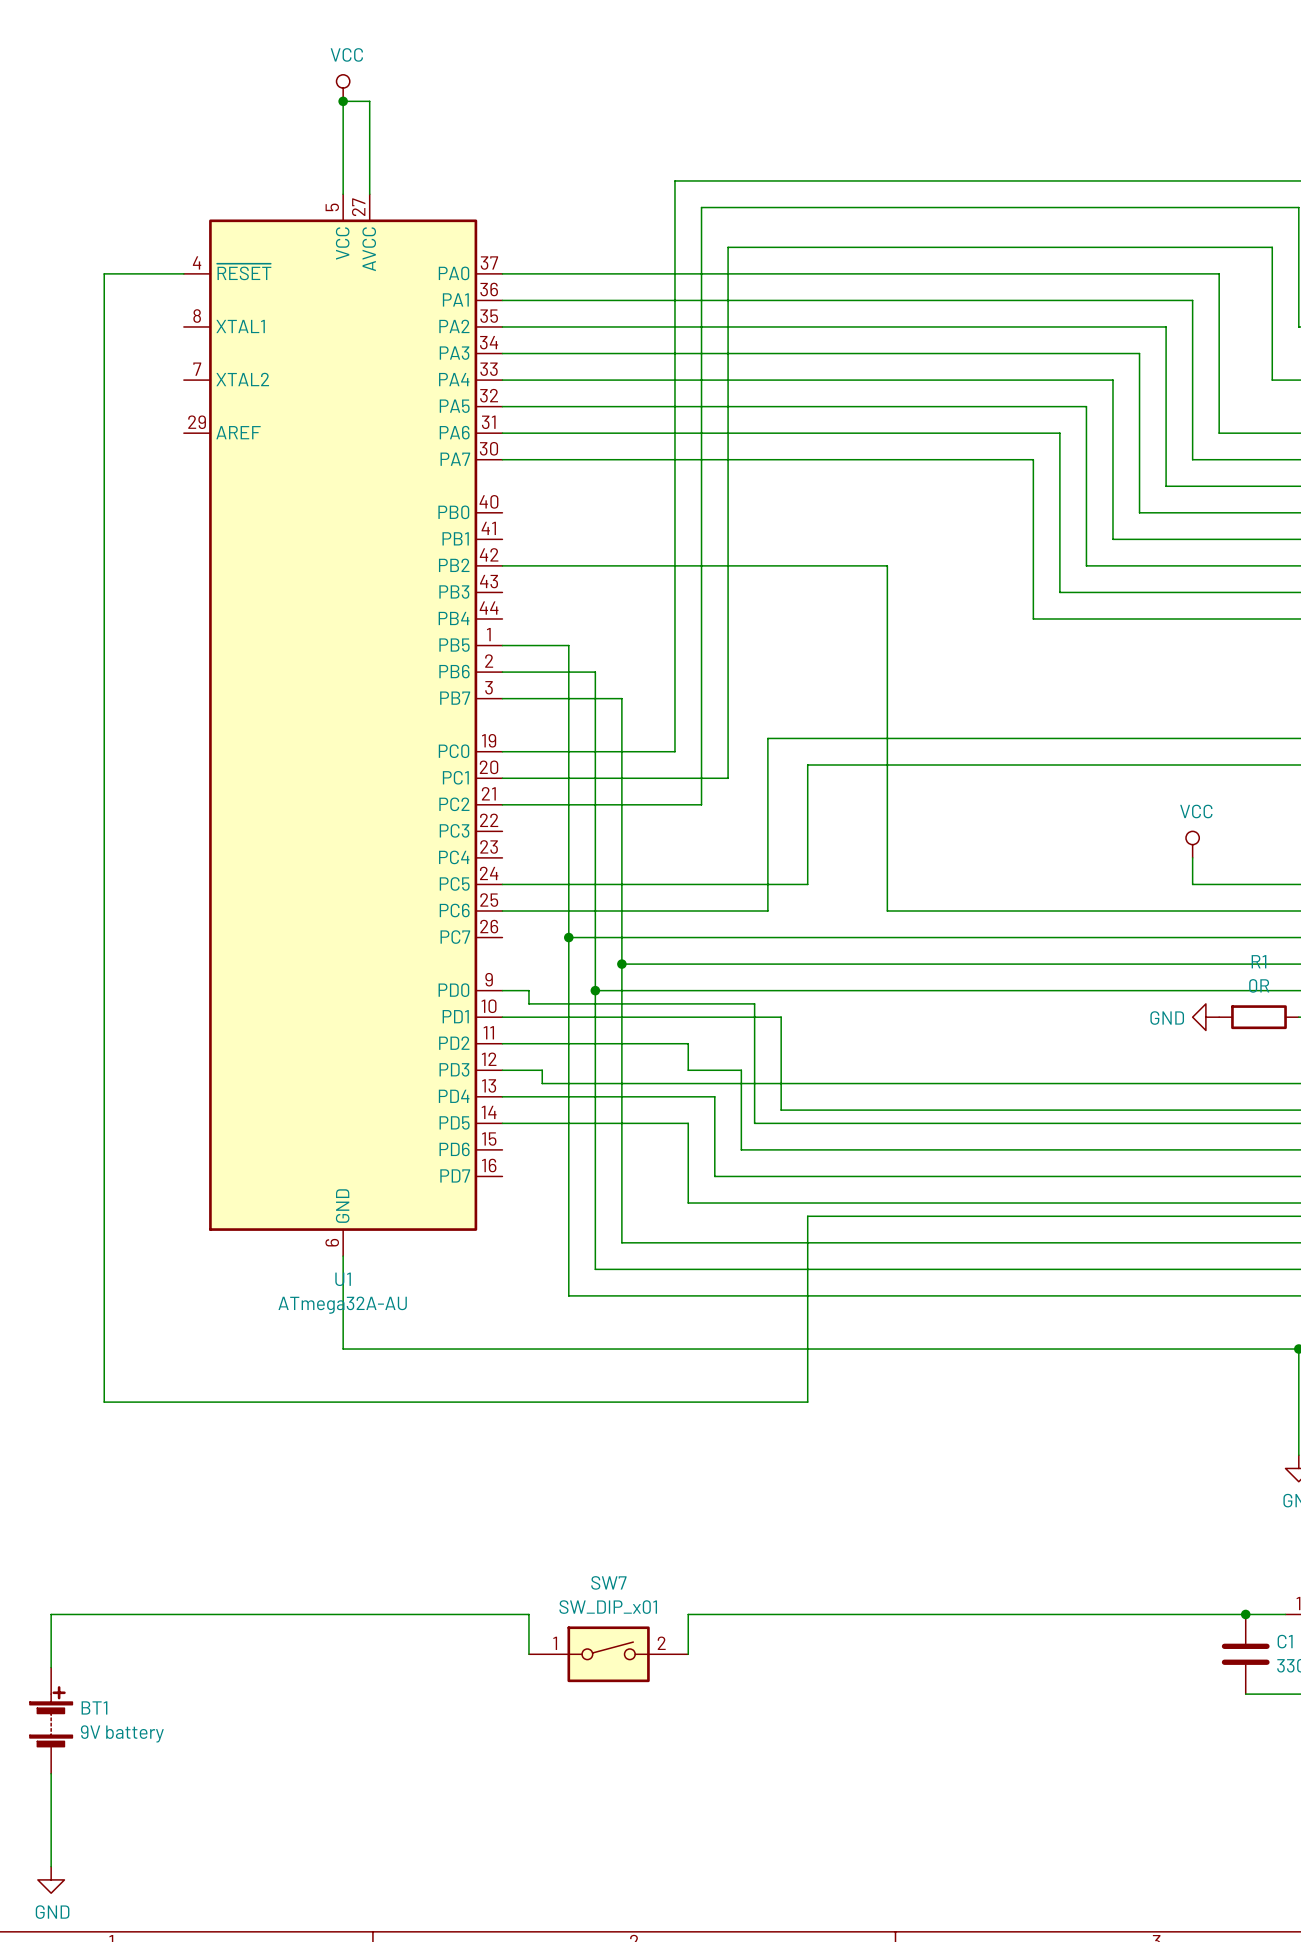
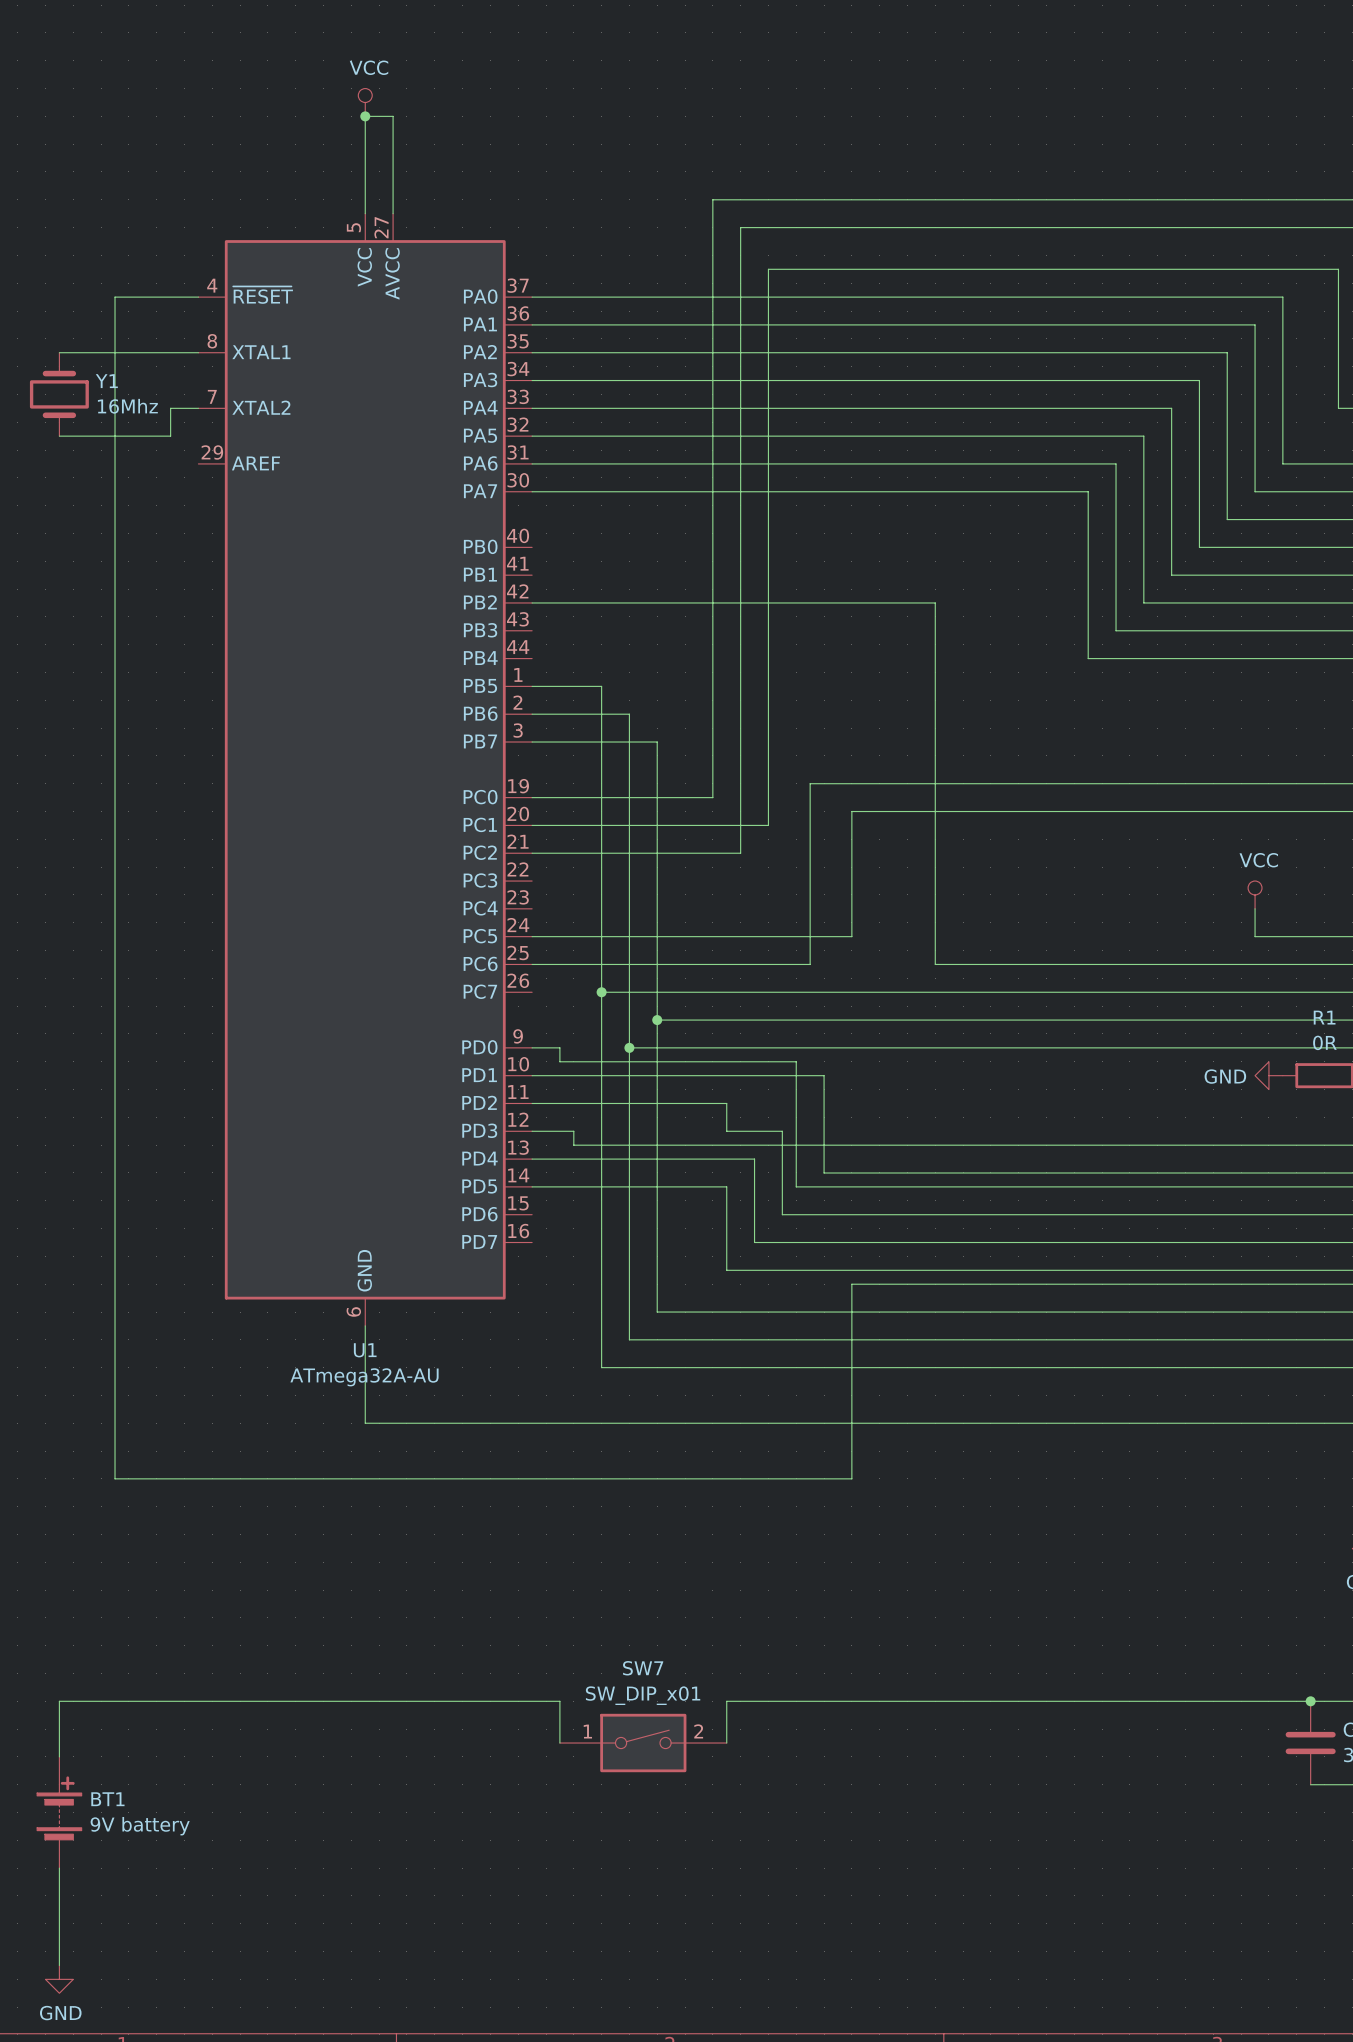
wire: none -> (59, 352) (198, 352)
Y1: none -> 16Mhz (59, 394)
wire: none -> (198, 408) (170, 408) (170, 436) (59, 436)

